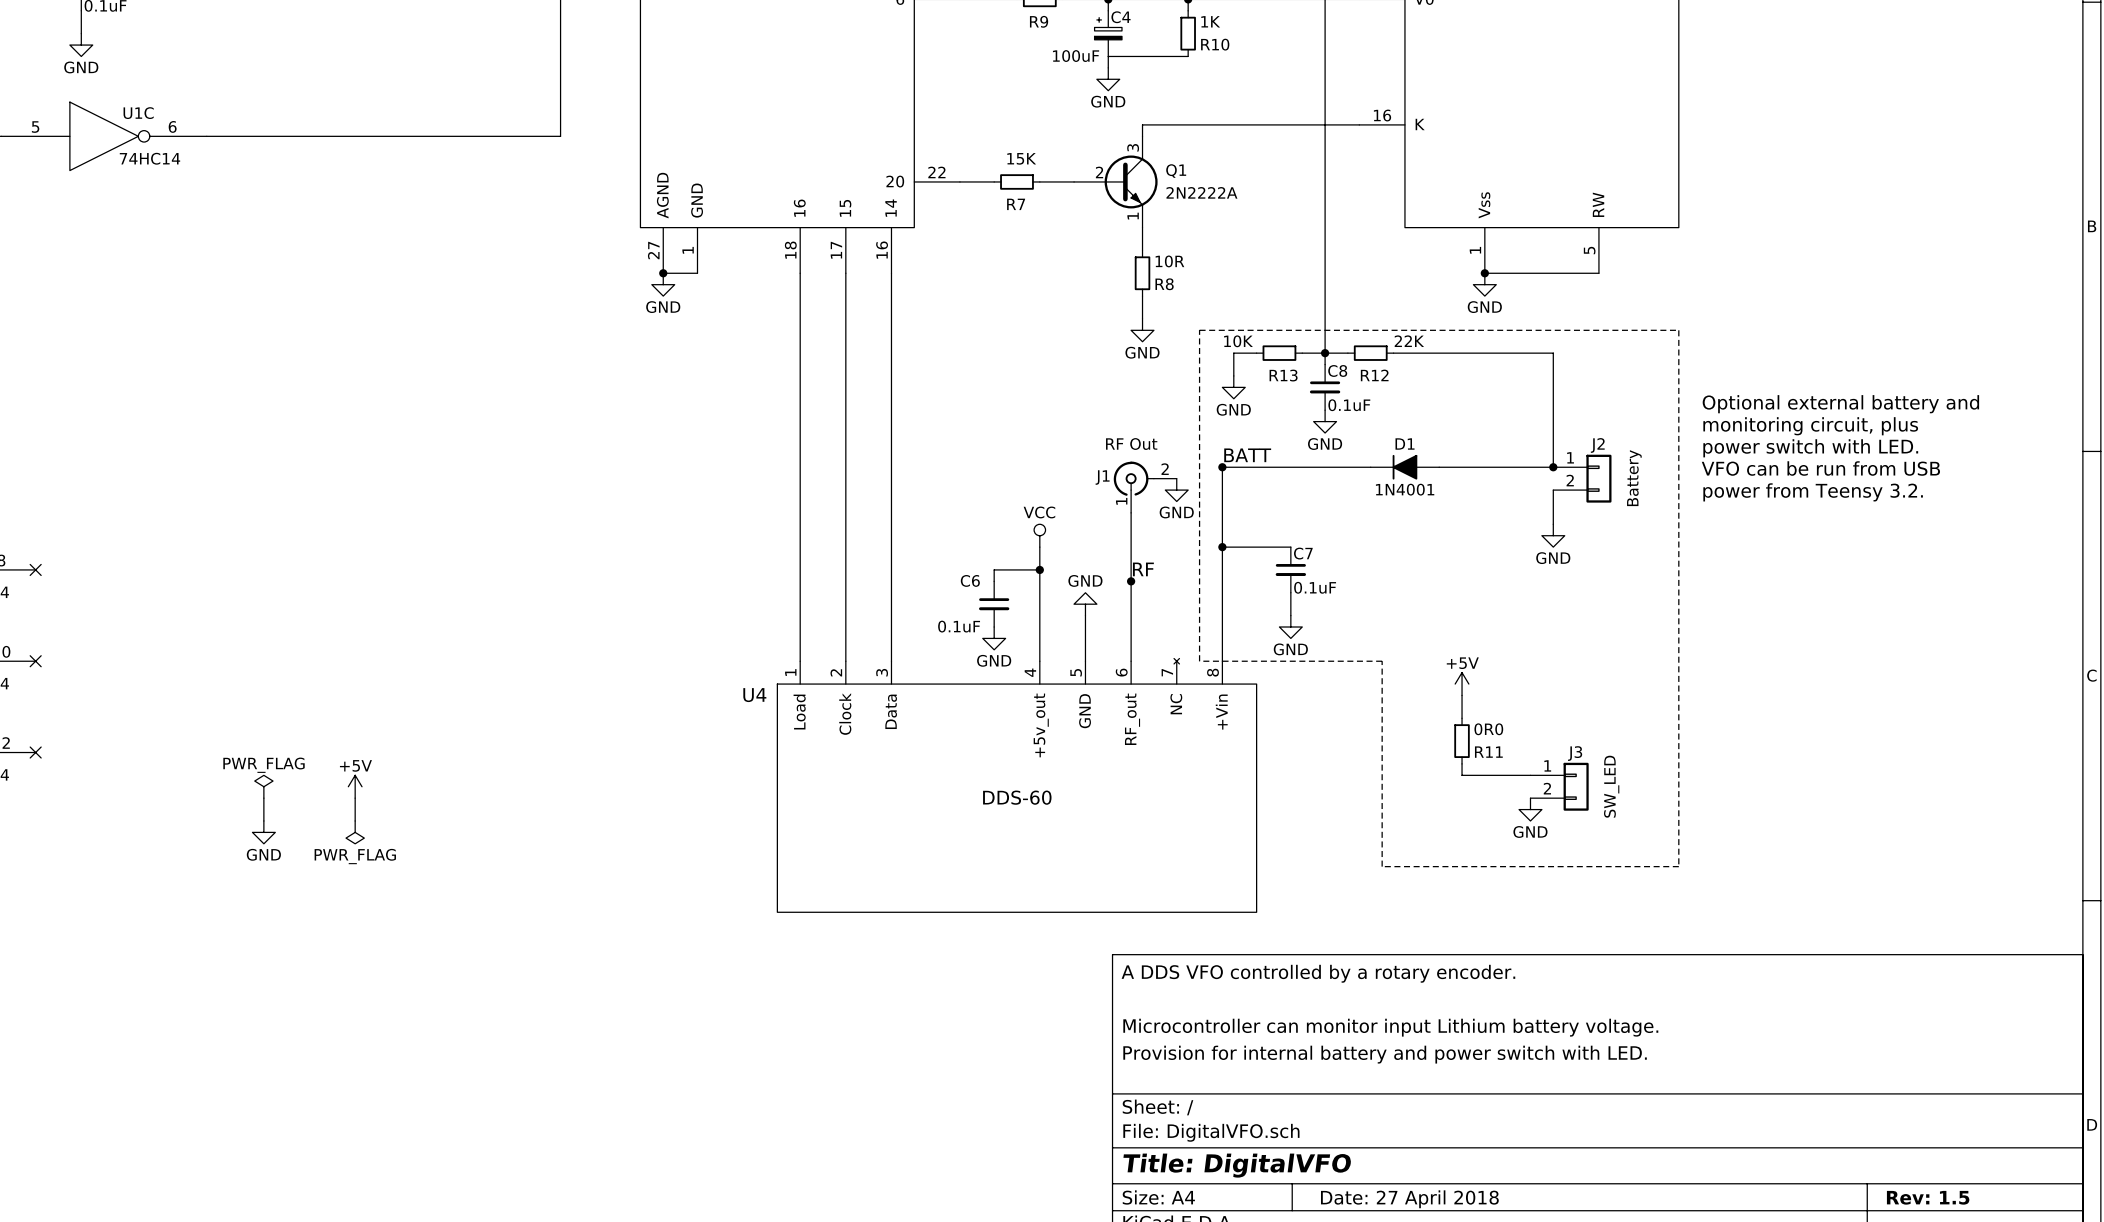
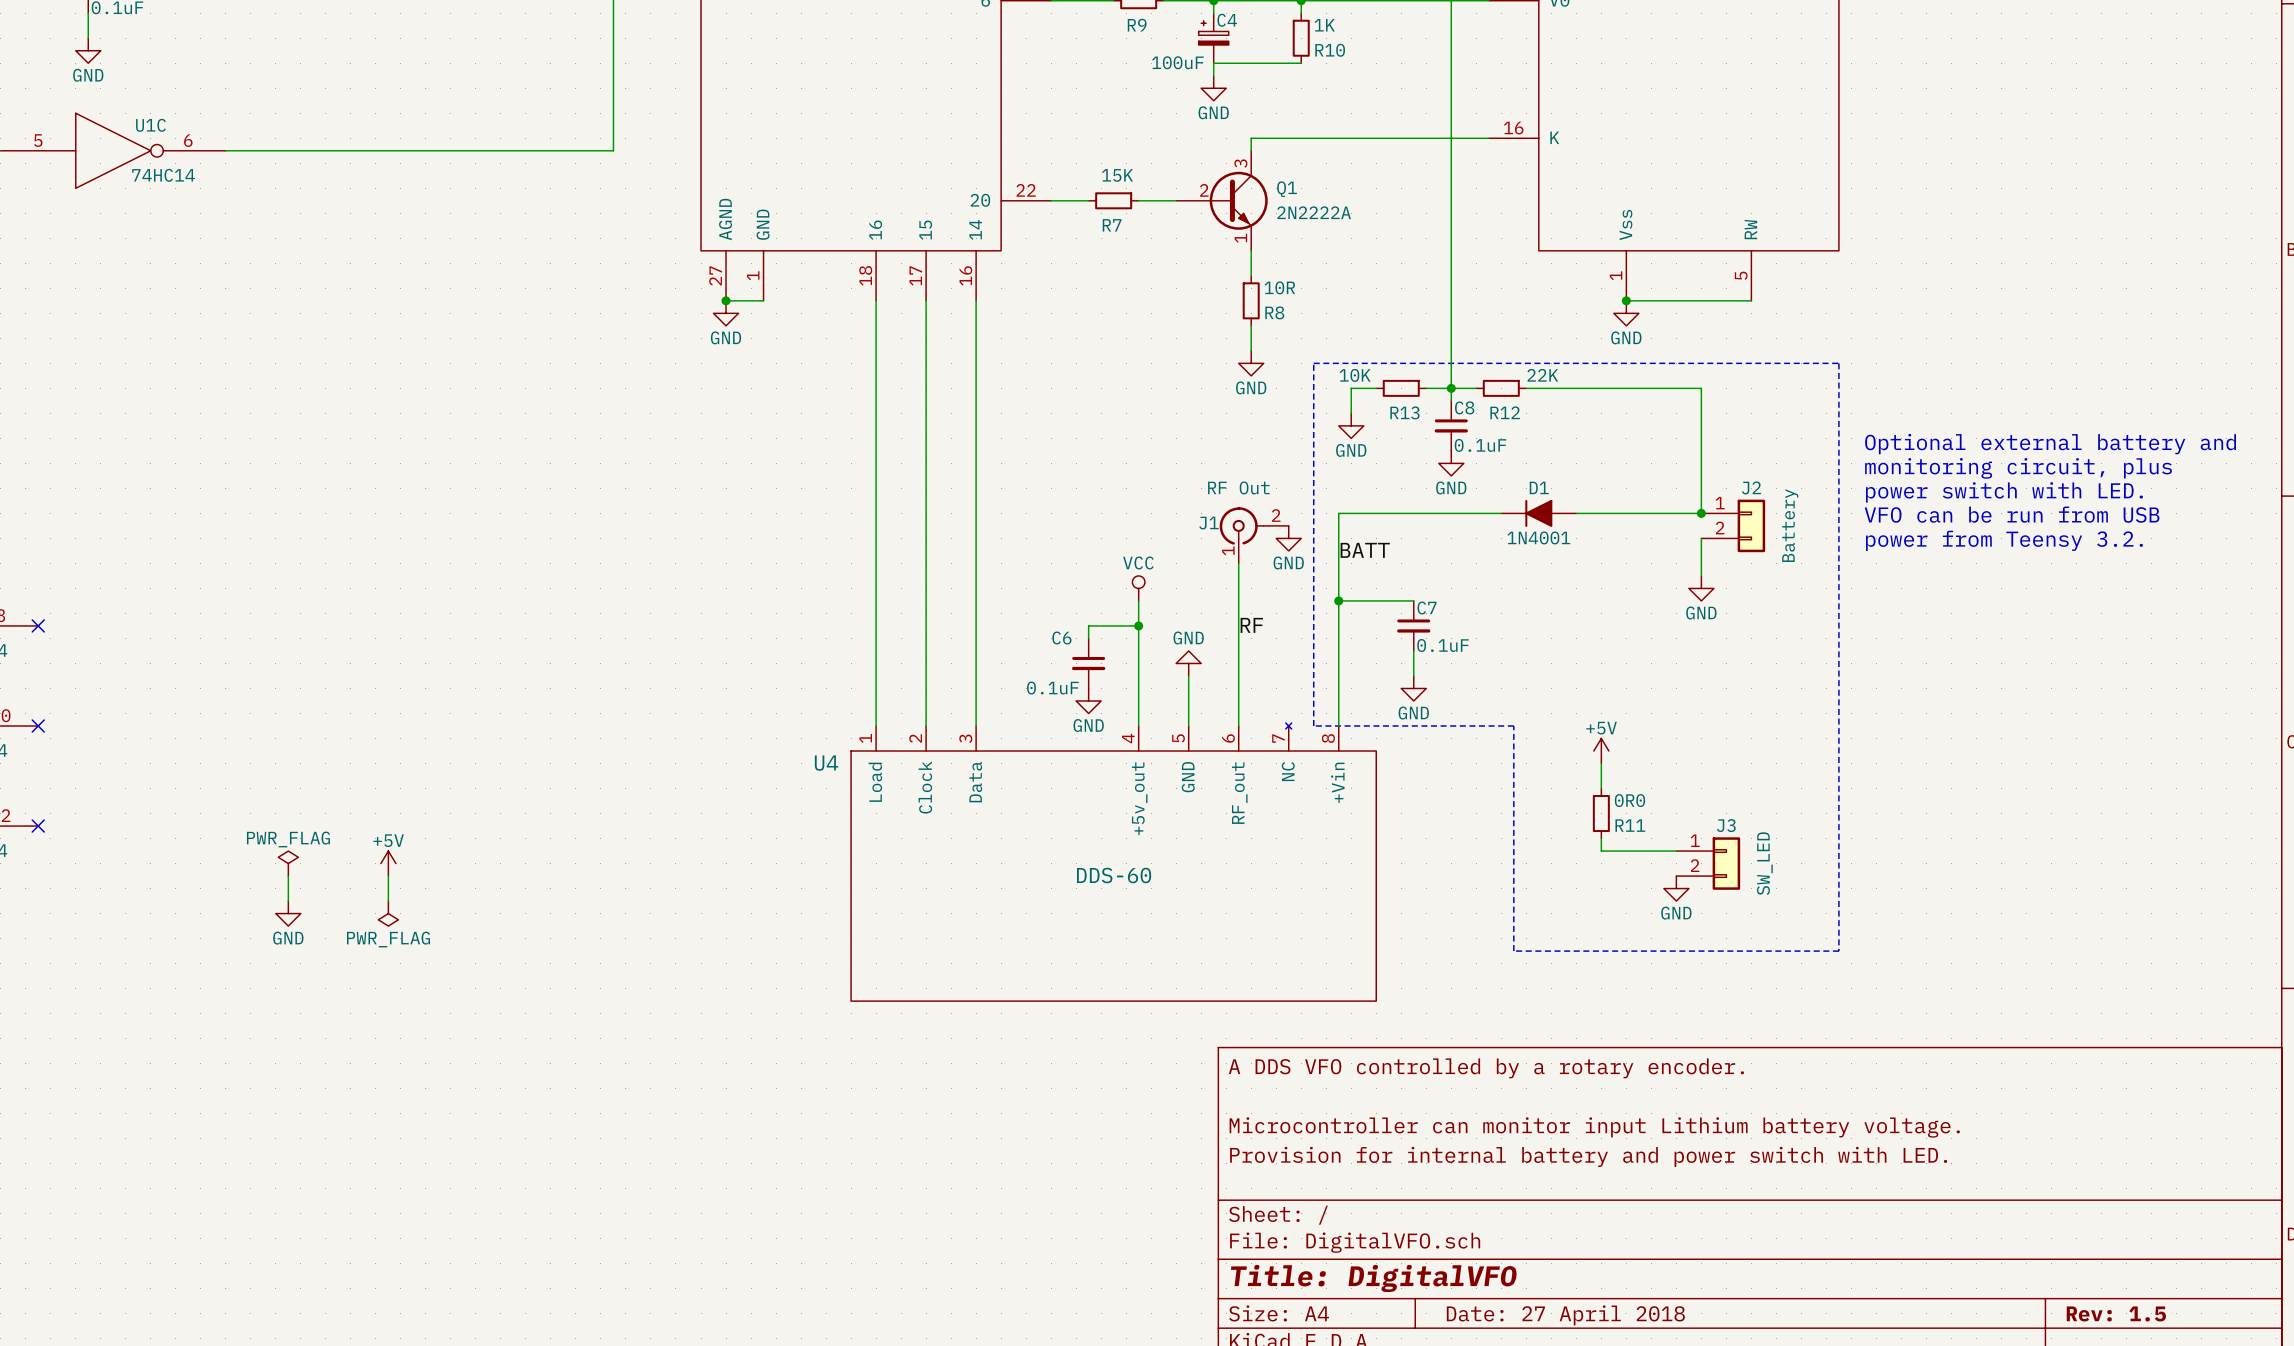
label position: BATT (1247, 455) -> BATT (1365, 550)
junction: (1222, 467) -> none
junction: (1131, 581) -> none

